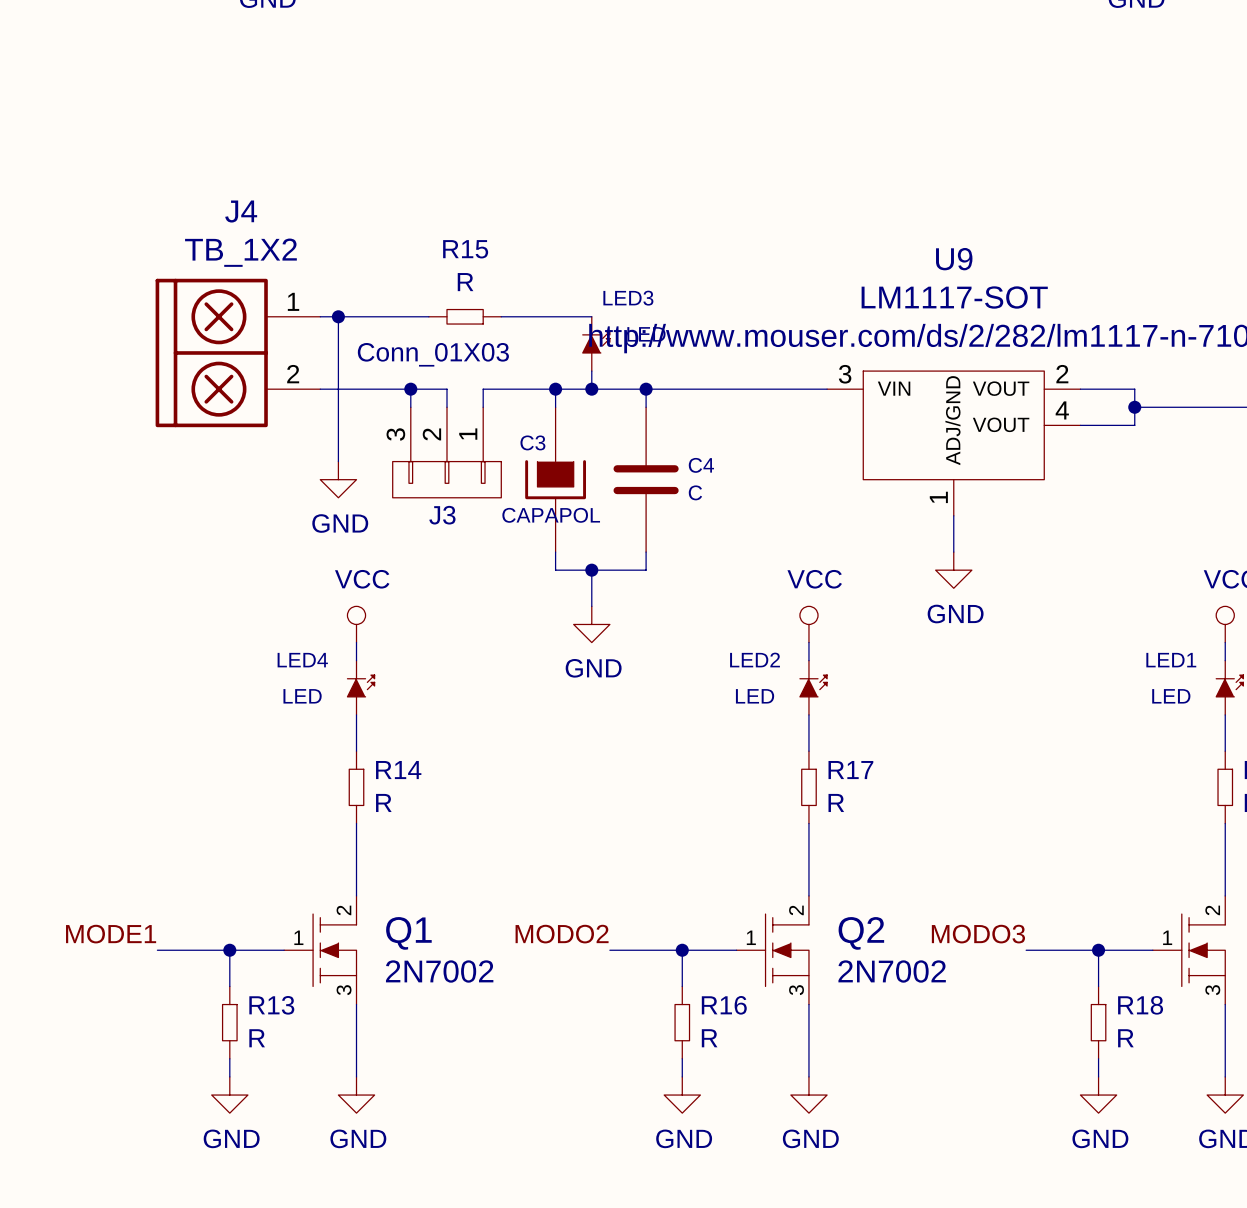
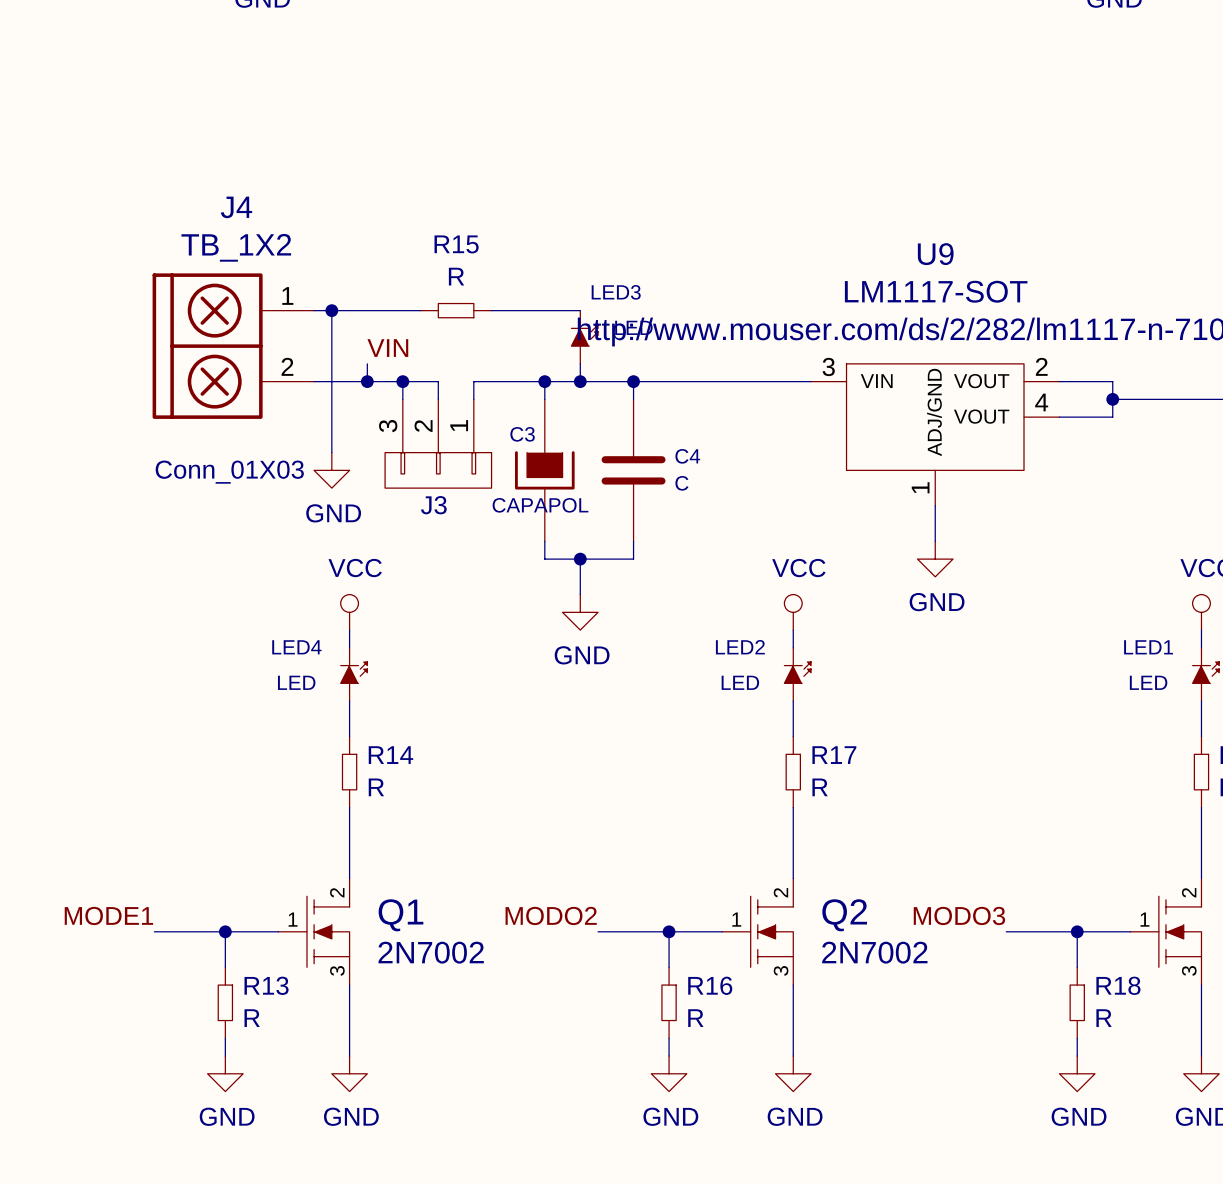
label: none -> VIN (387, 348)
J3 value position: Conn_01X03 (433, 354) -> Conn_01X03 (229, 472)
wire: none -> (367, 363) (367, 381)
junction: none -> (367, 381)

